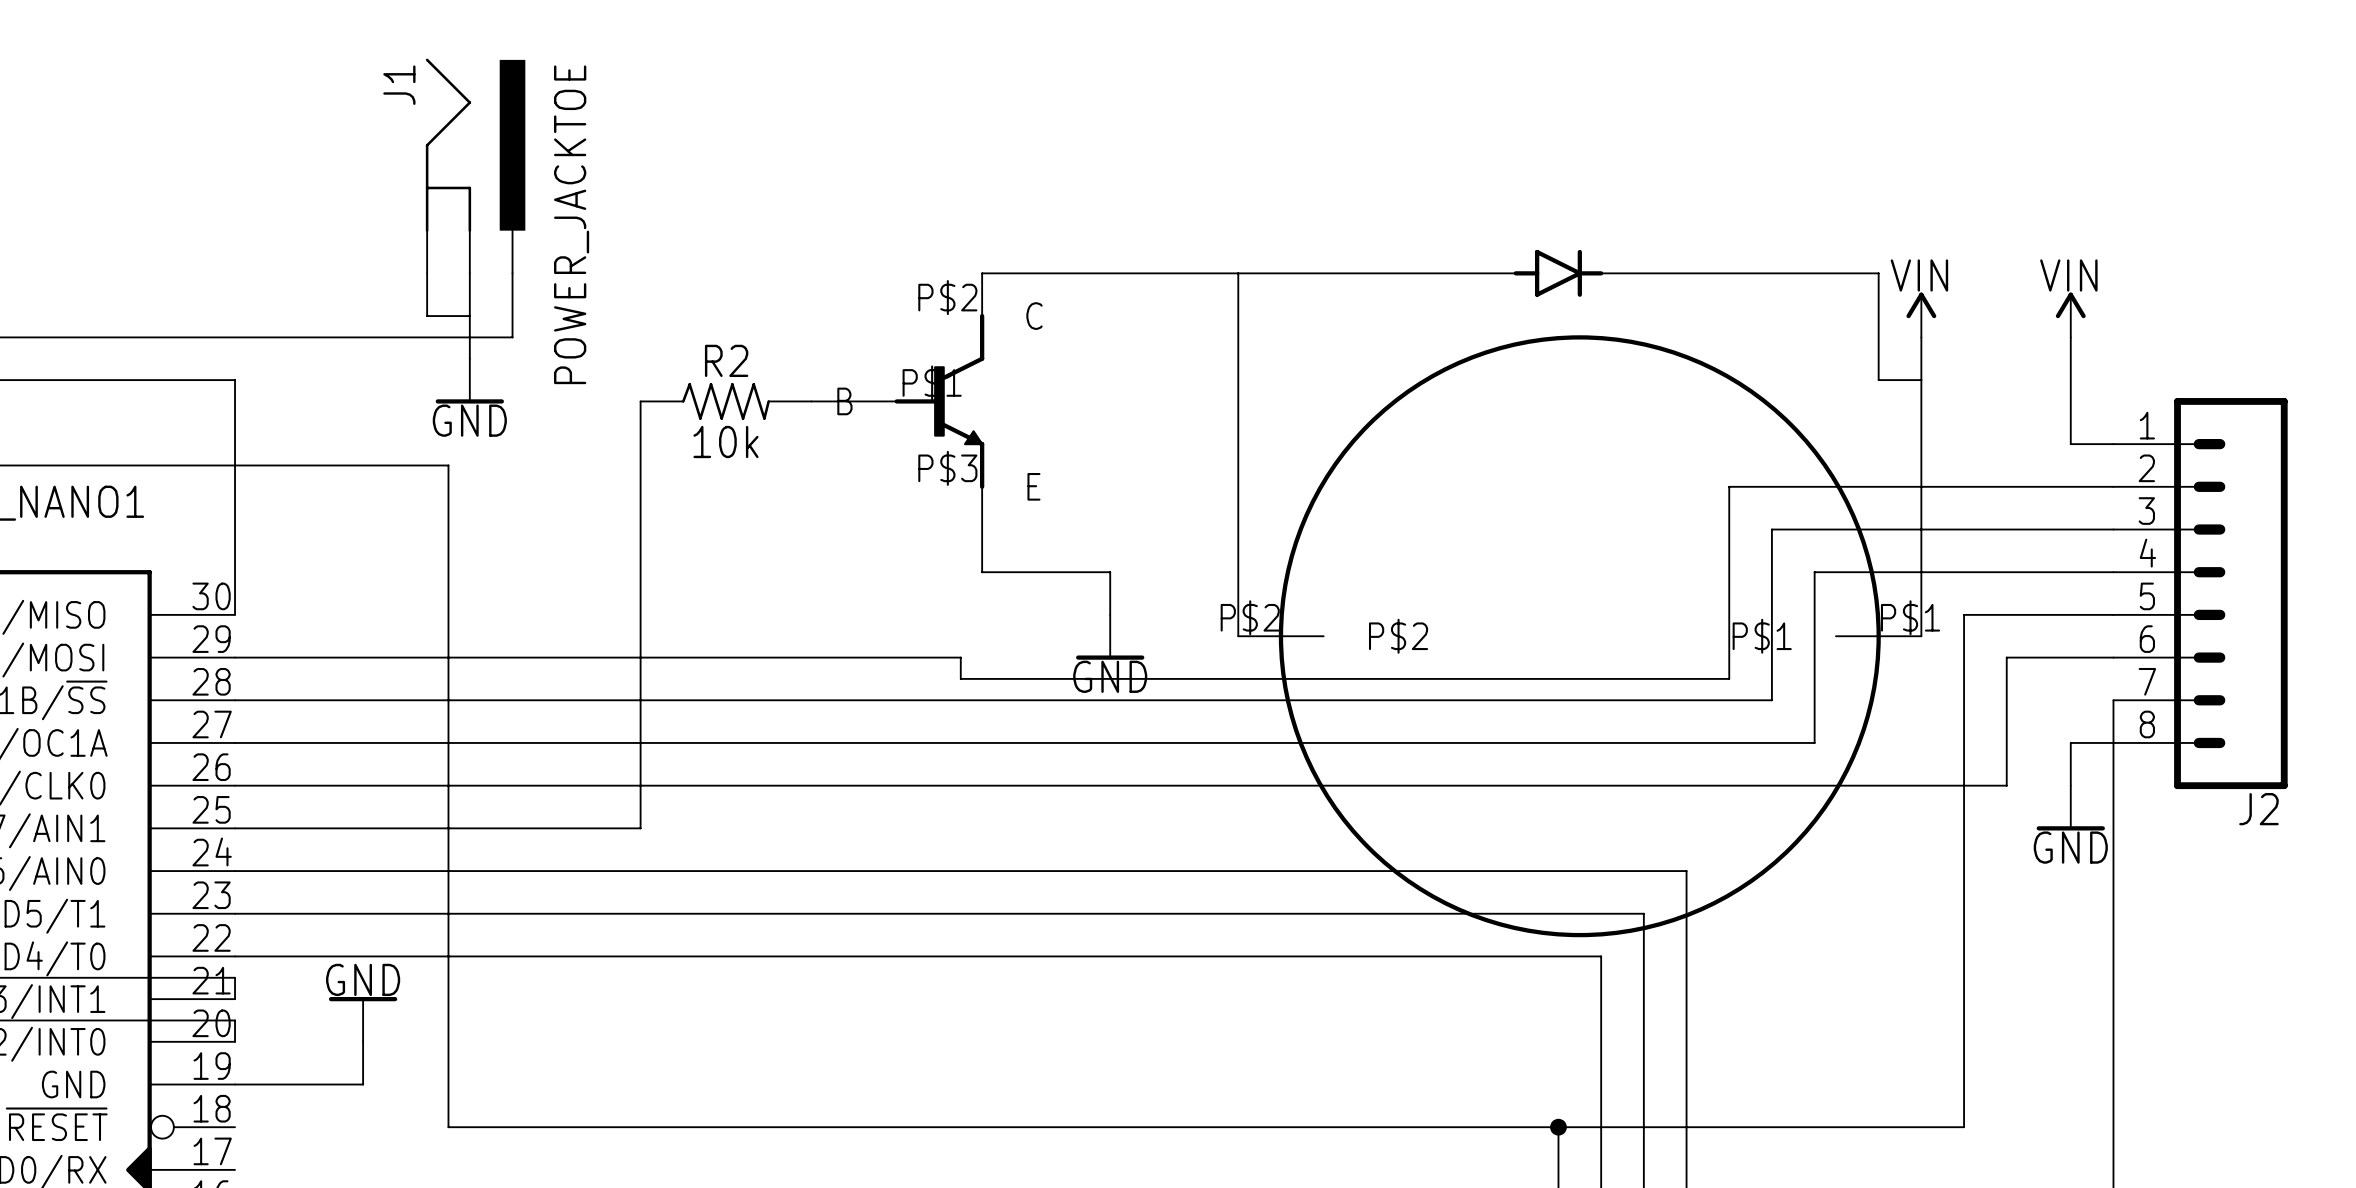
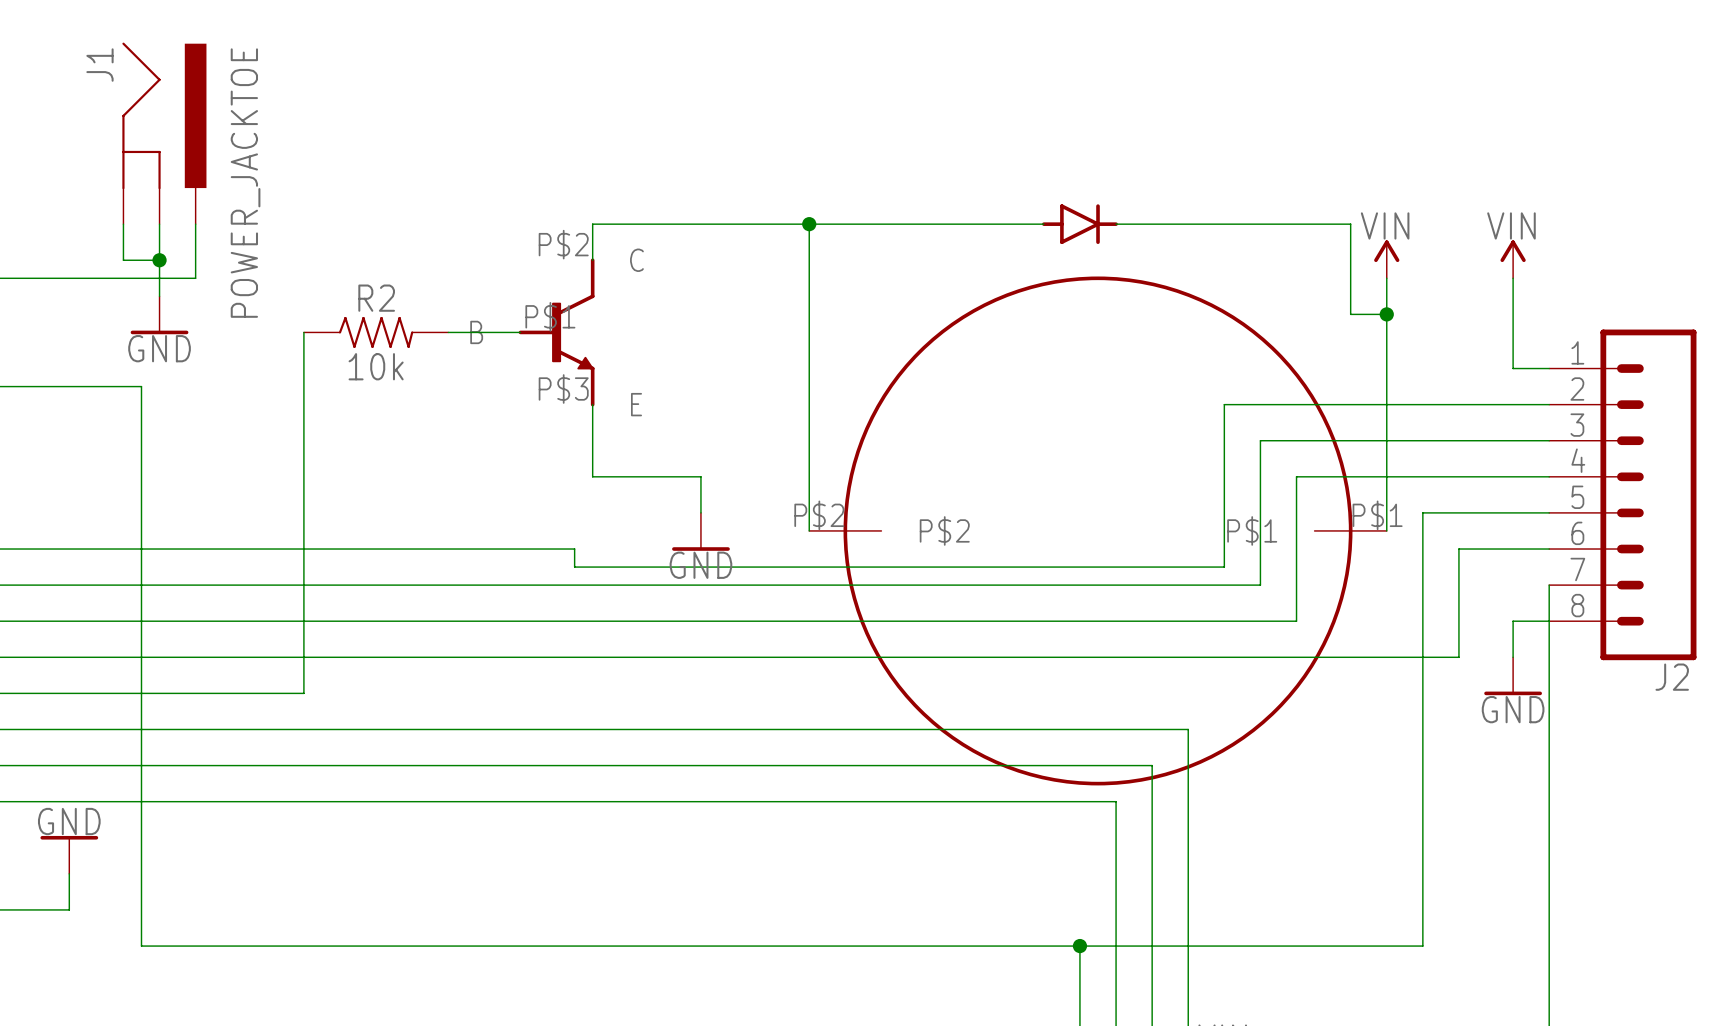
junction: none -> (809, 224)
junction: none -> (159, 260)
junction: none -> (1386, 314)

